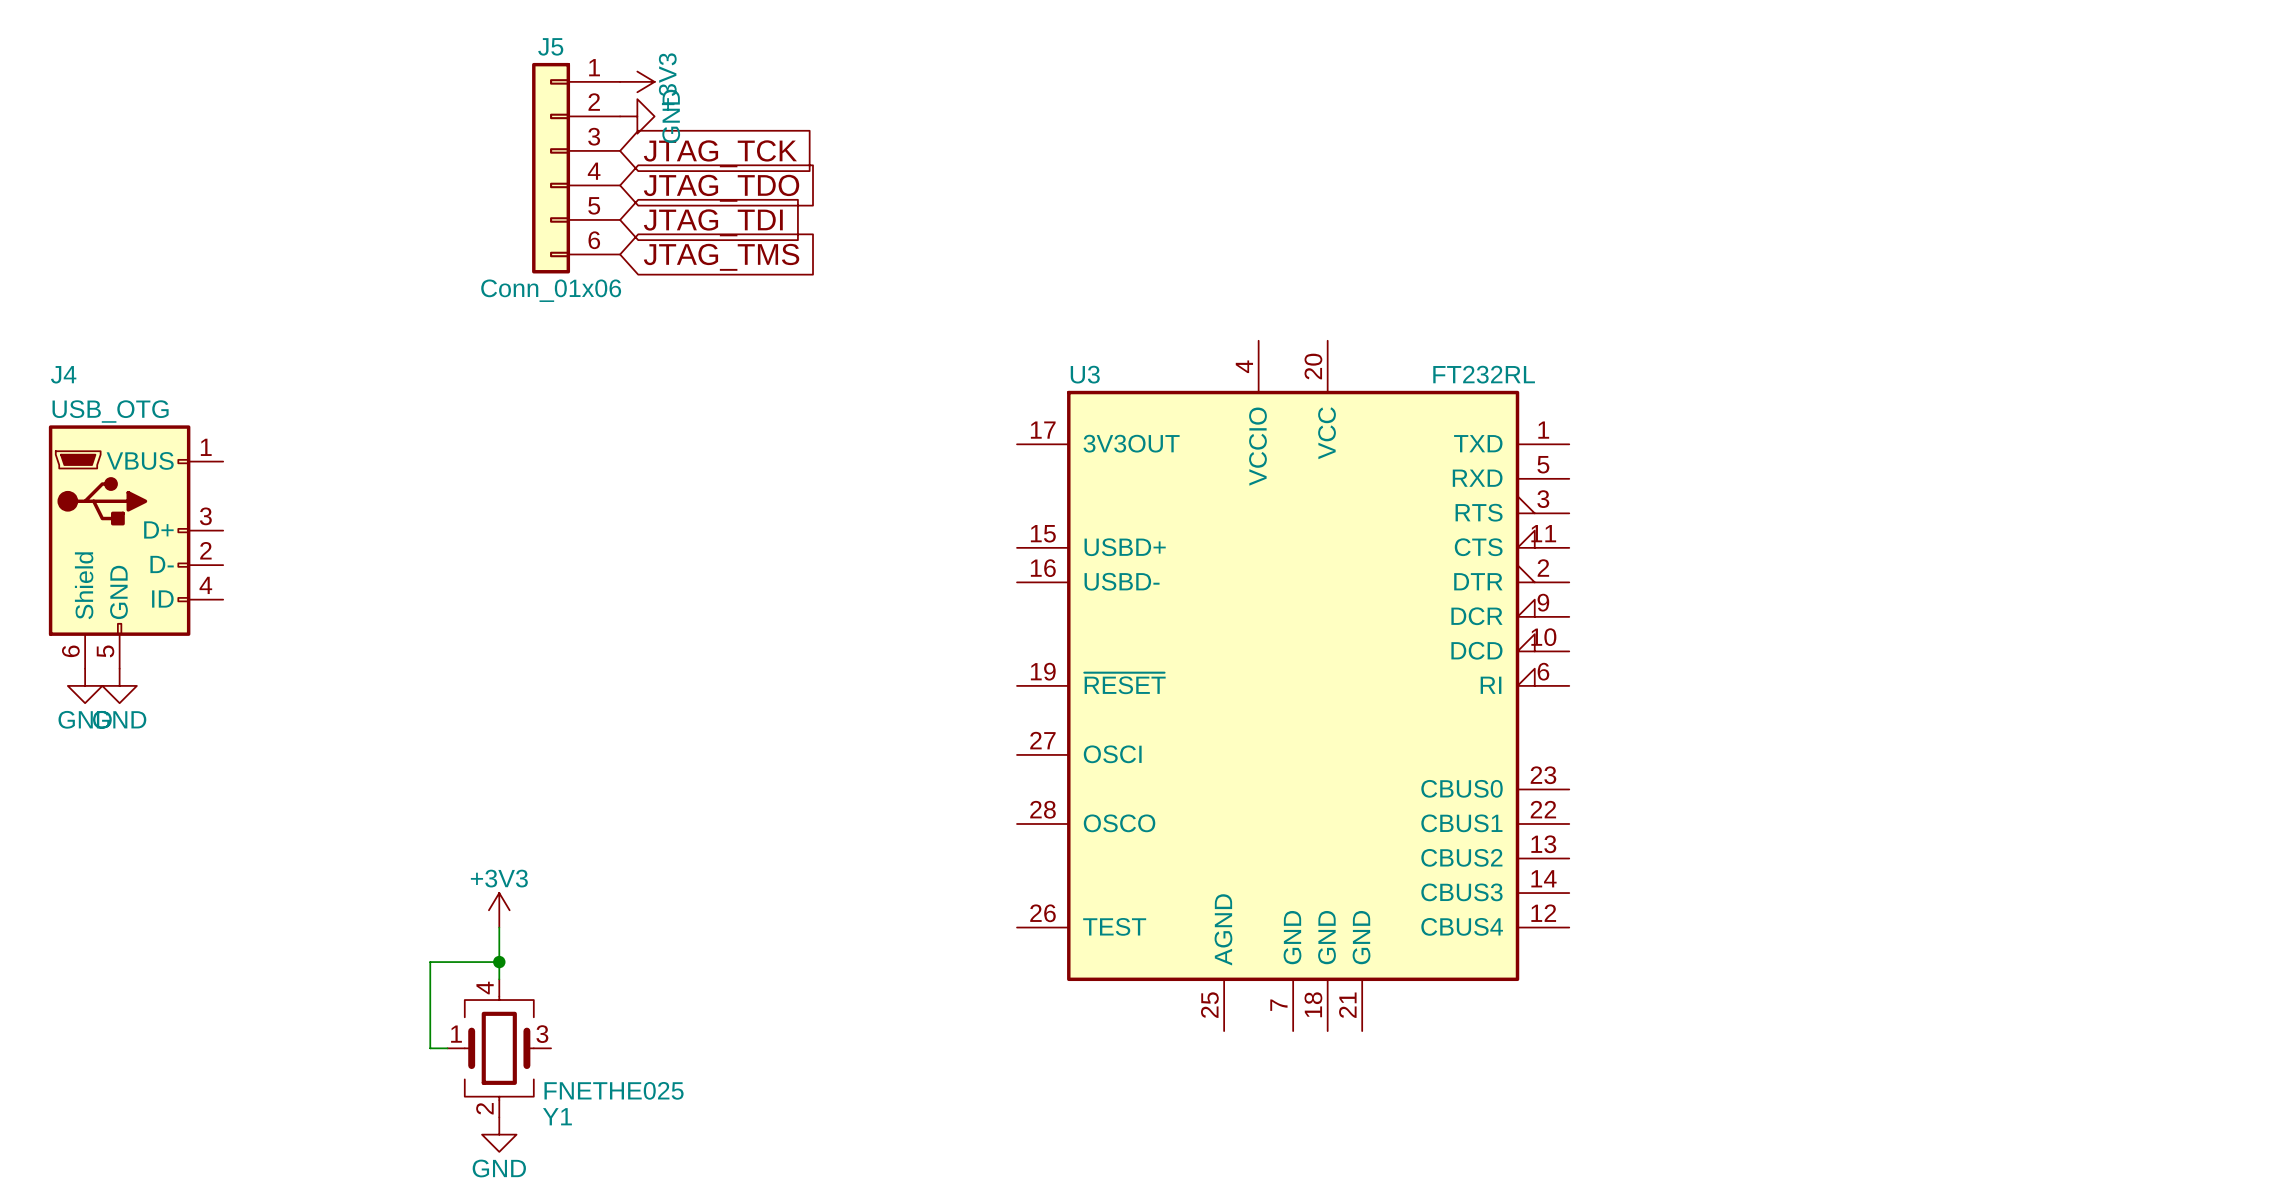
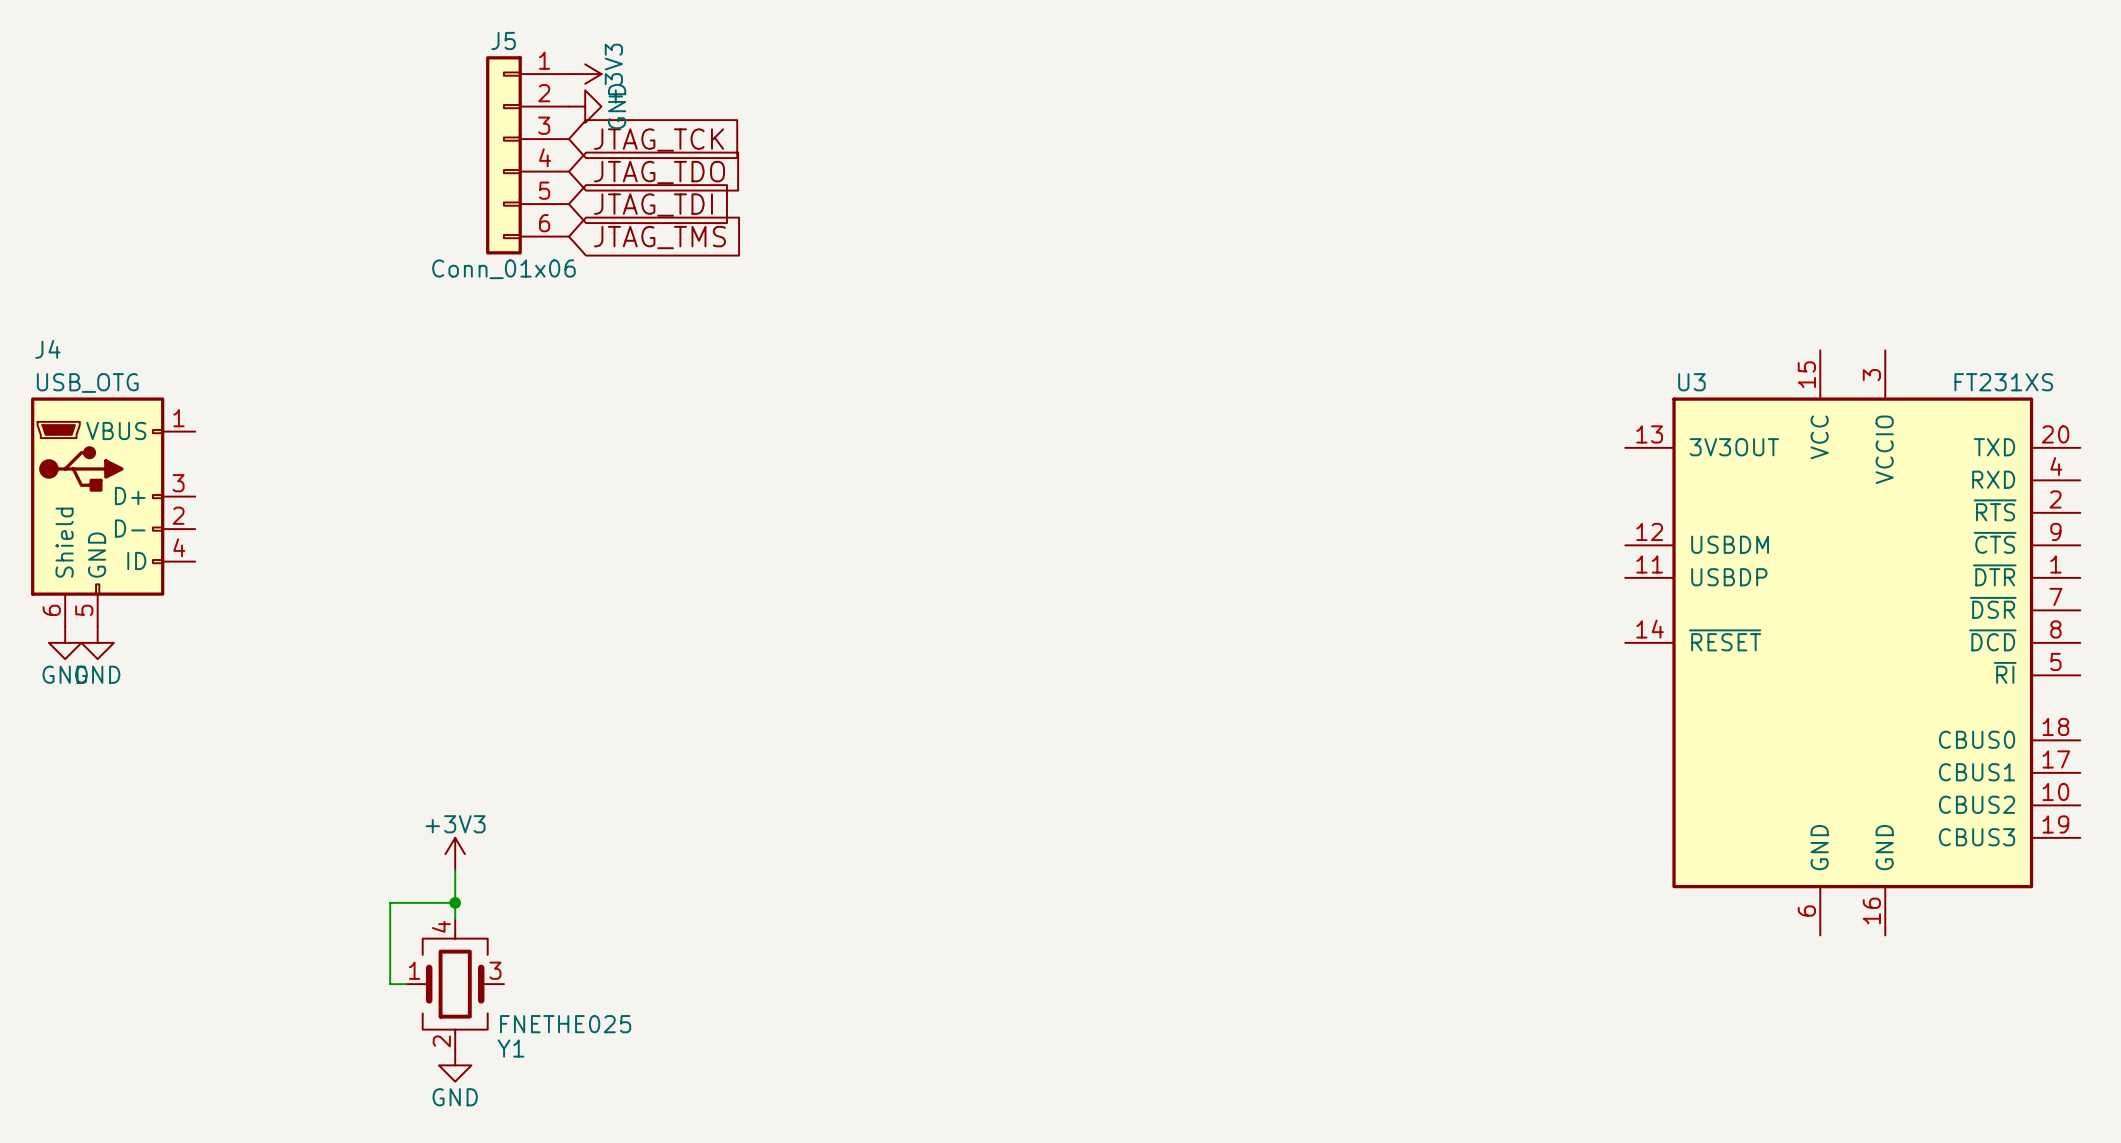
U3 symbol: [1017, 340, 1570, 1032] -> [1625, 350, 2081, 936]
U3 name position: U3 (1085, 374) -> U3 (1691, 382)
U3 value: FT232RL (1484, 374) -> FT231XS (2003, 382)

